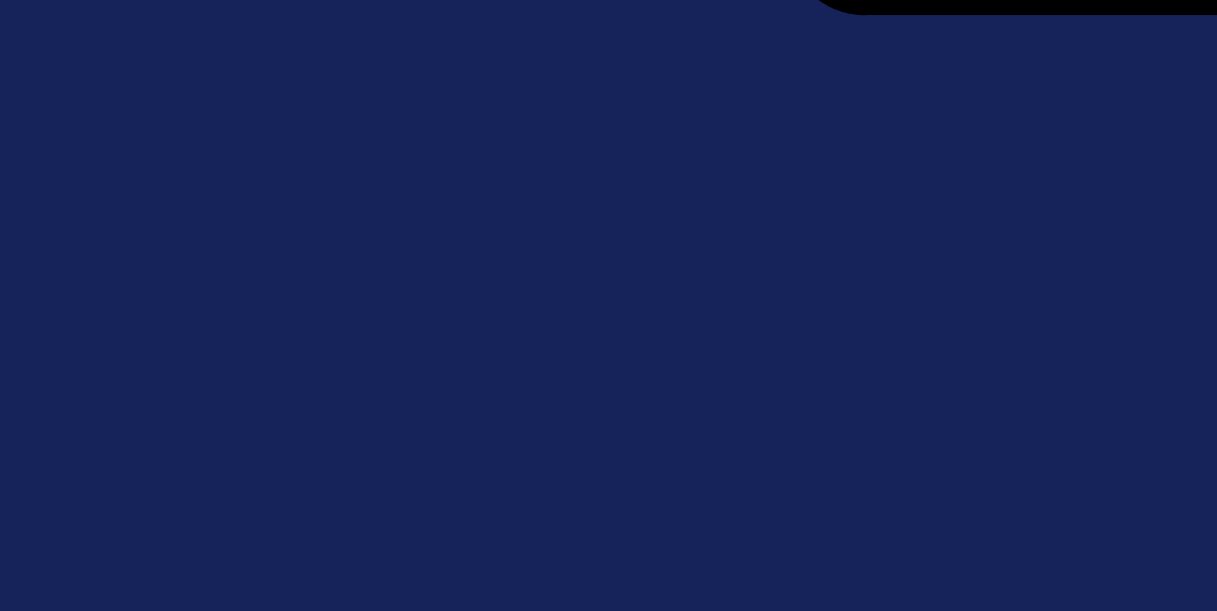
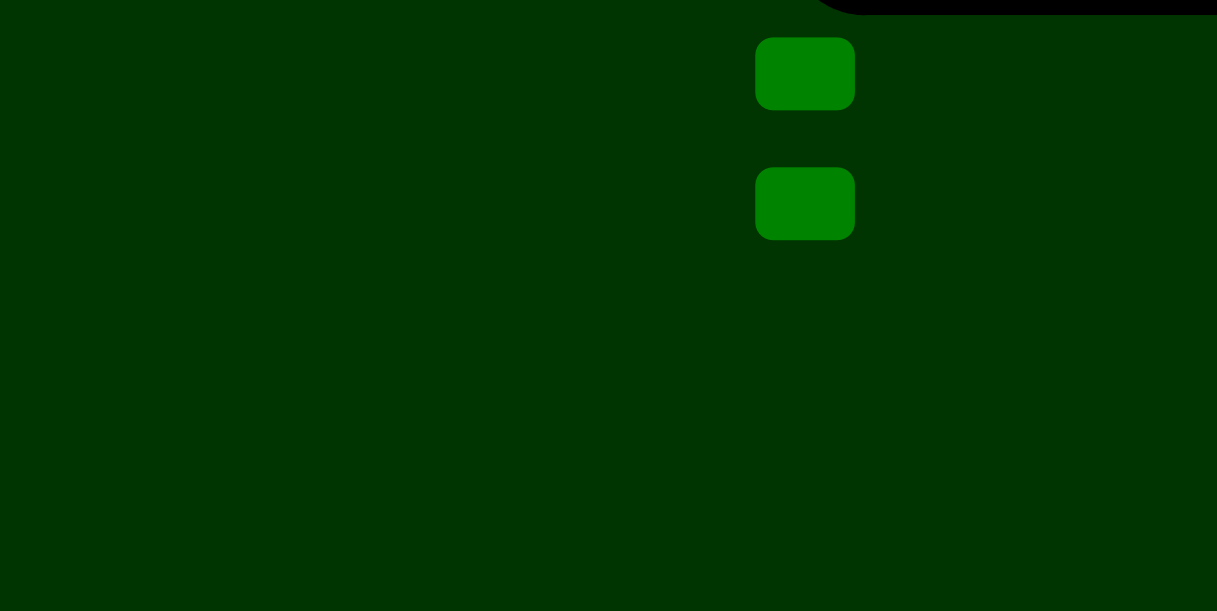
part: none -> (805, 138)

